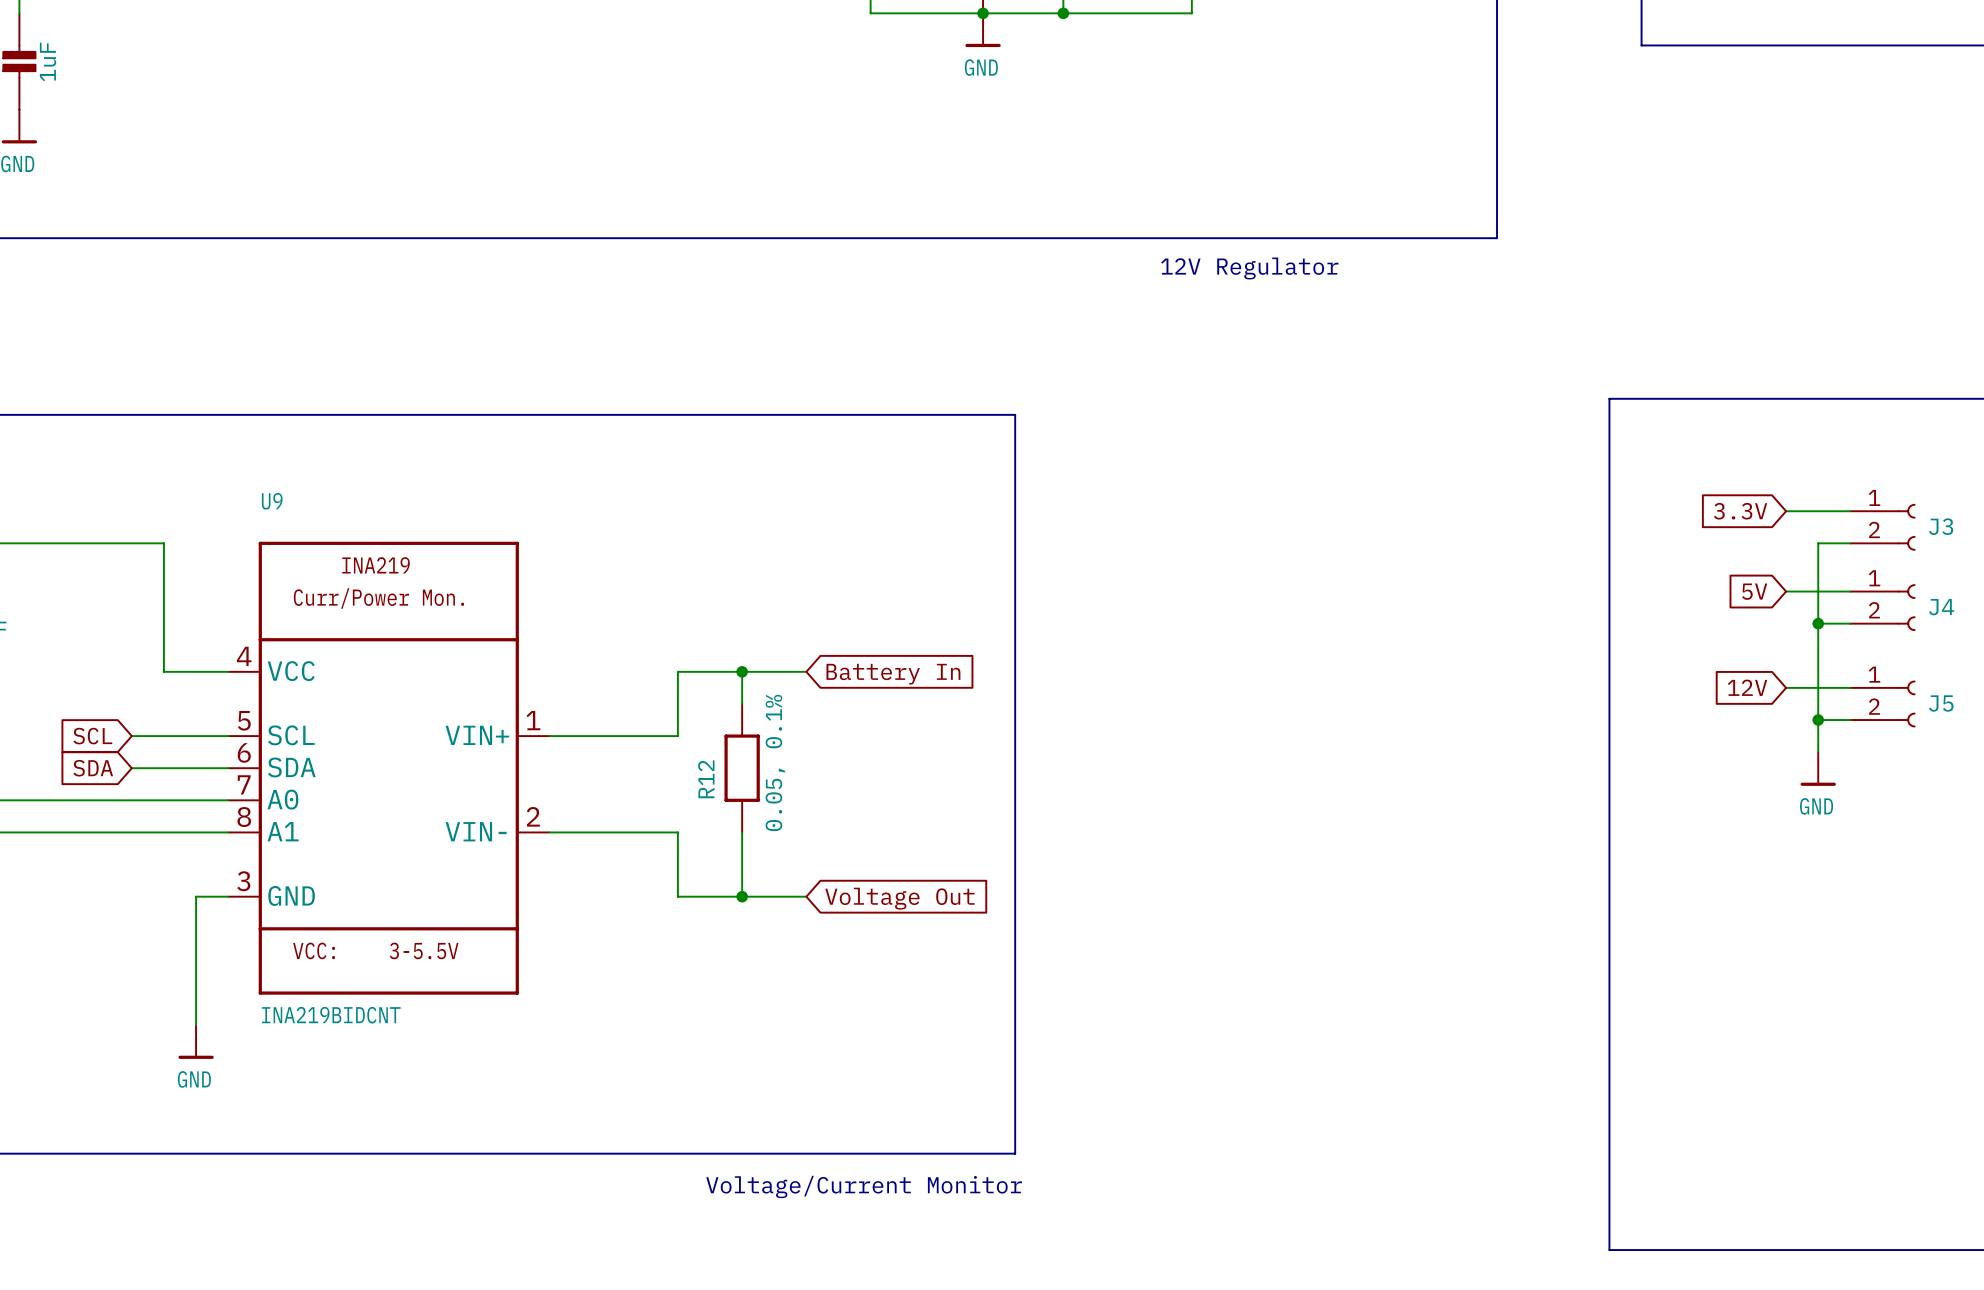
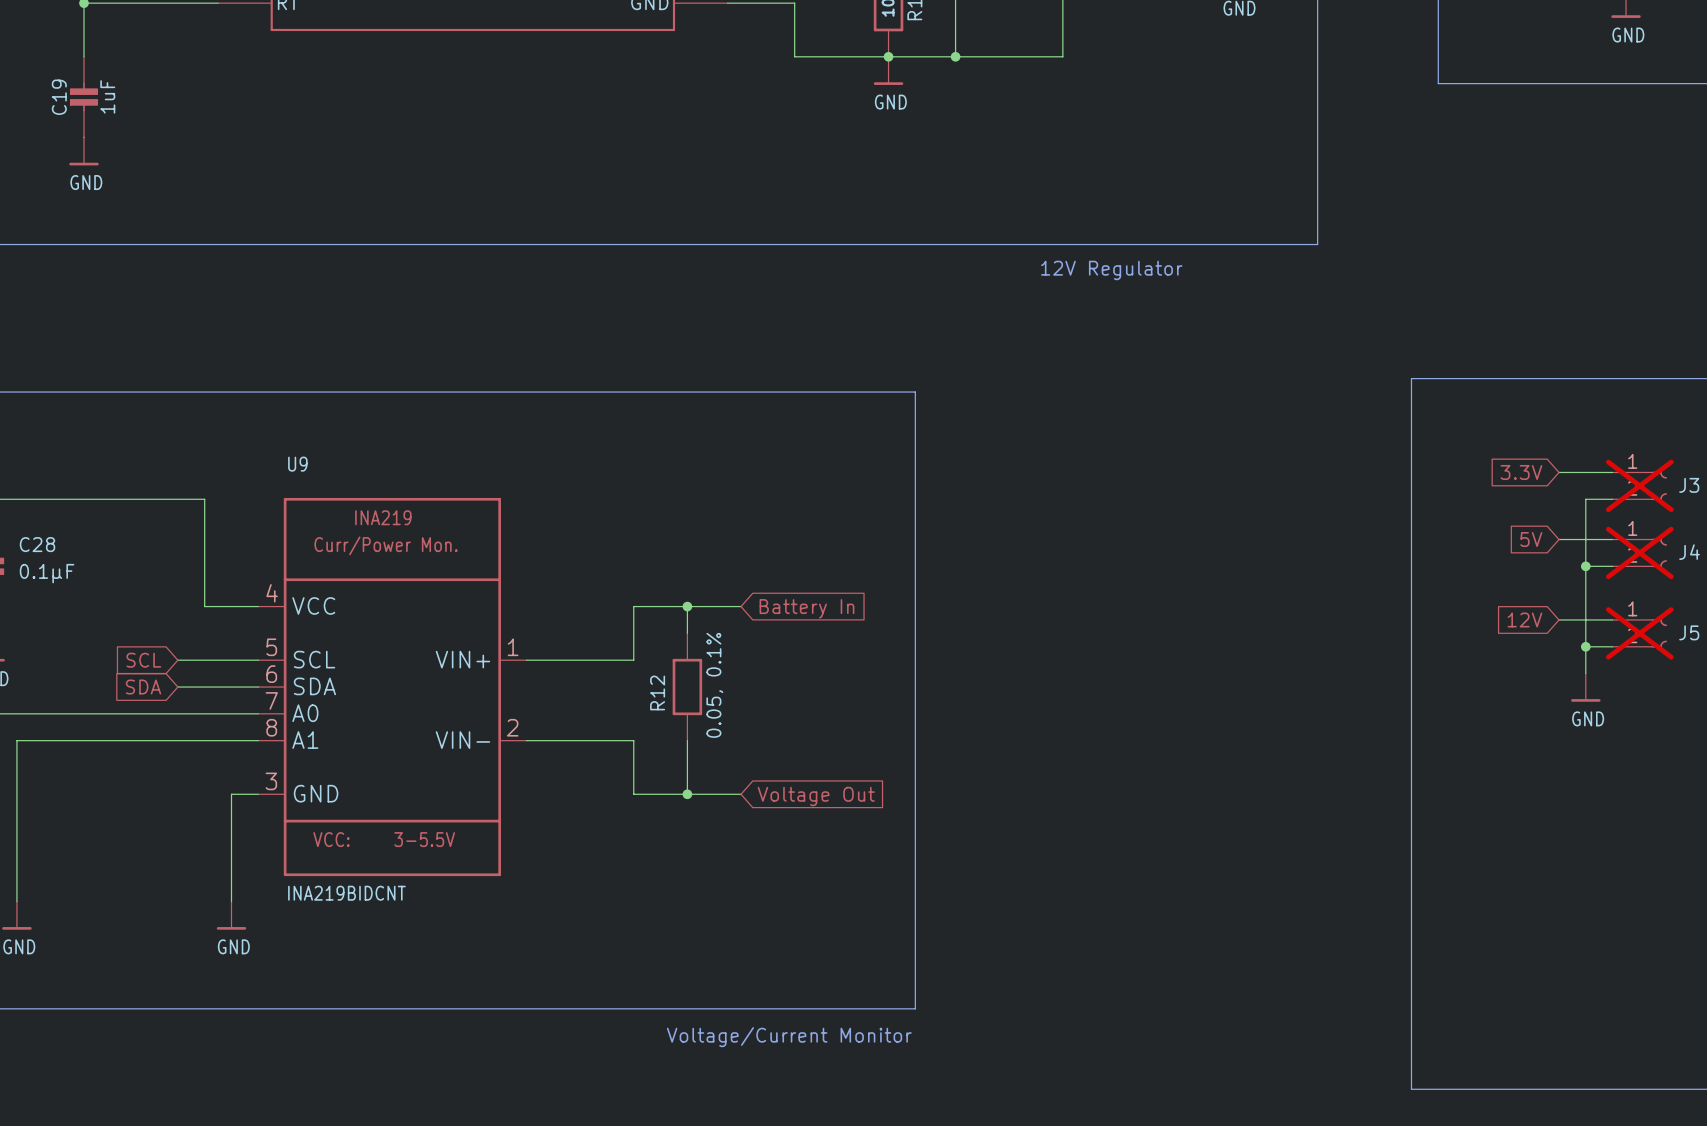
J3 do-not-place cross: none -> (1639, 485)
J4 do-not-place cross: none -> (1639, 552)
J5 do-not-place cross: none -> (1639, 633)

